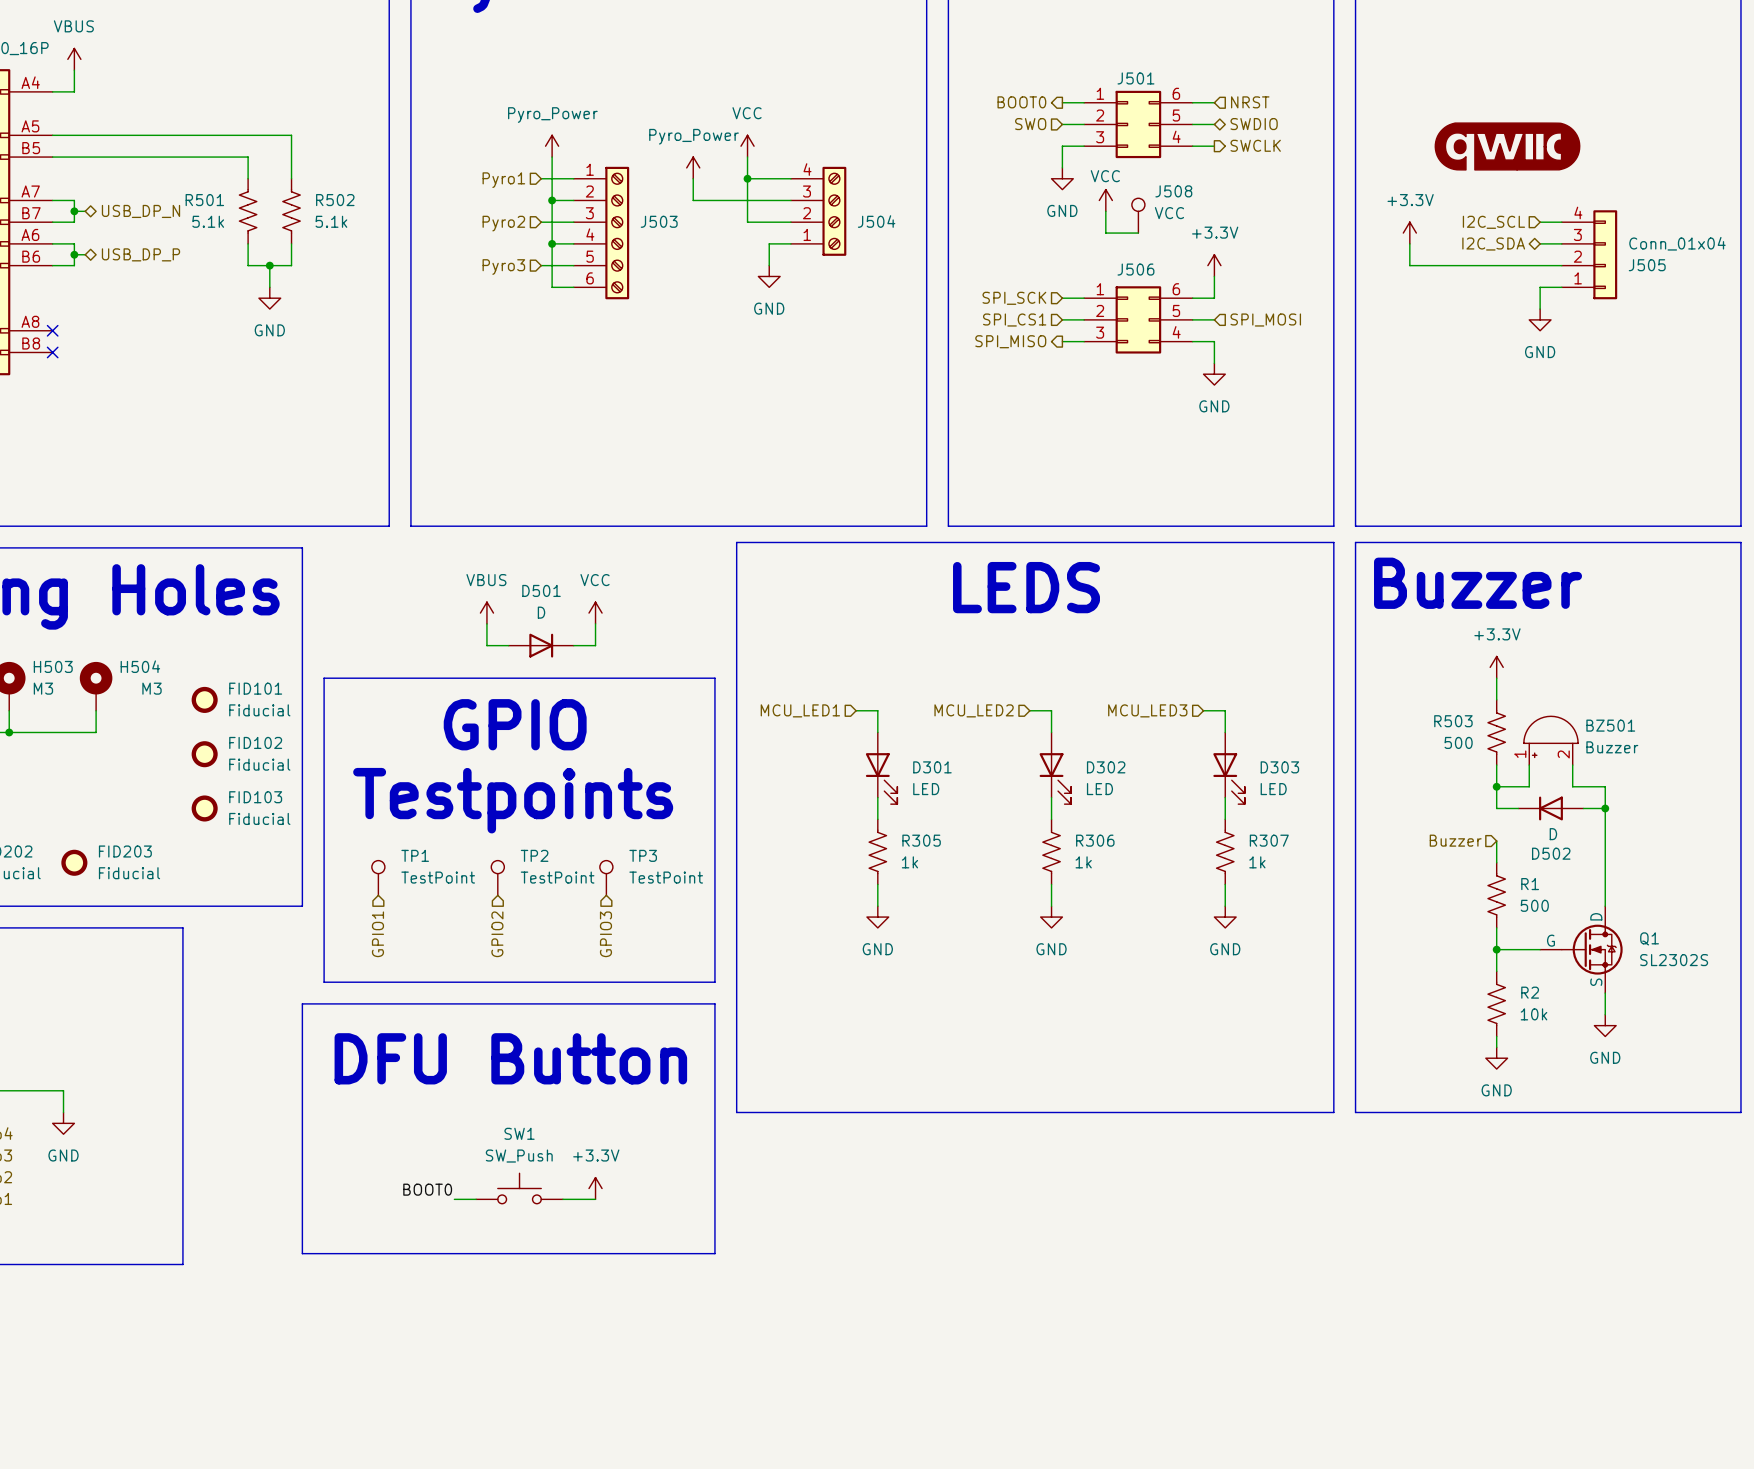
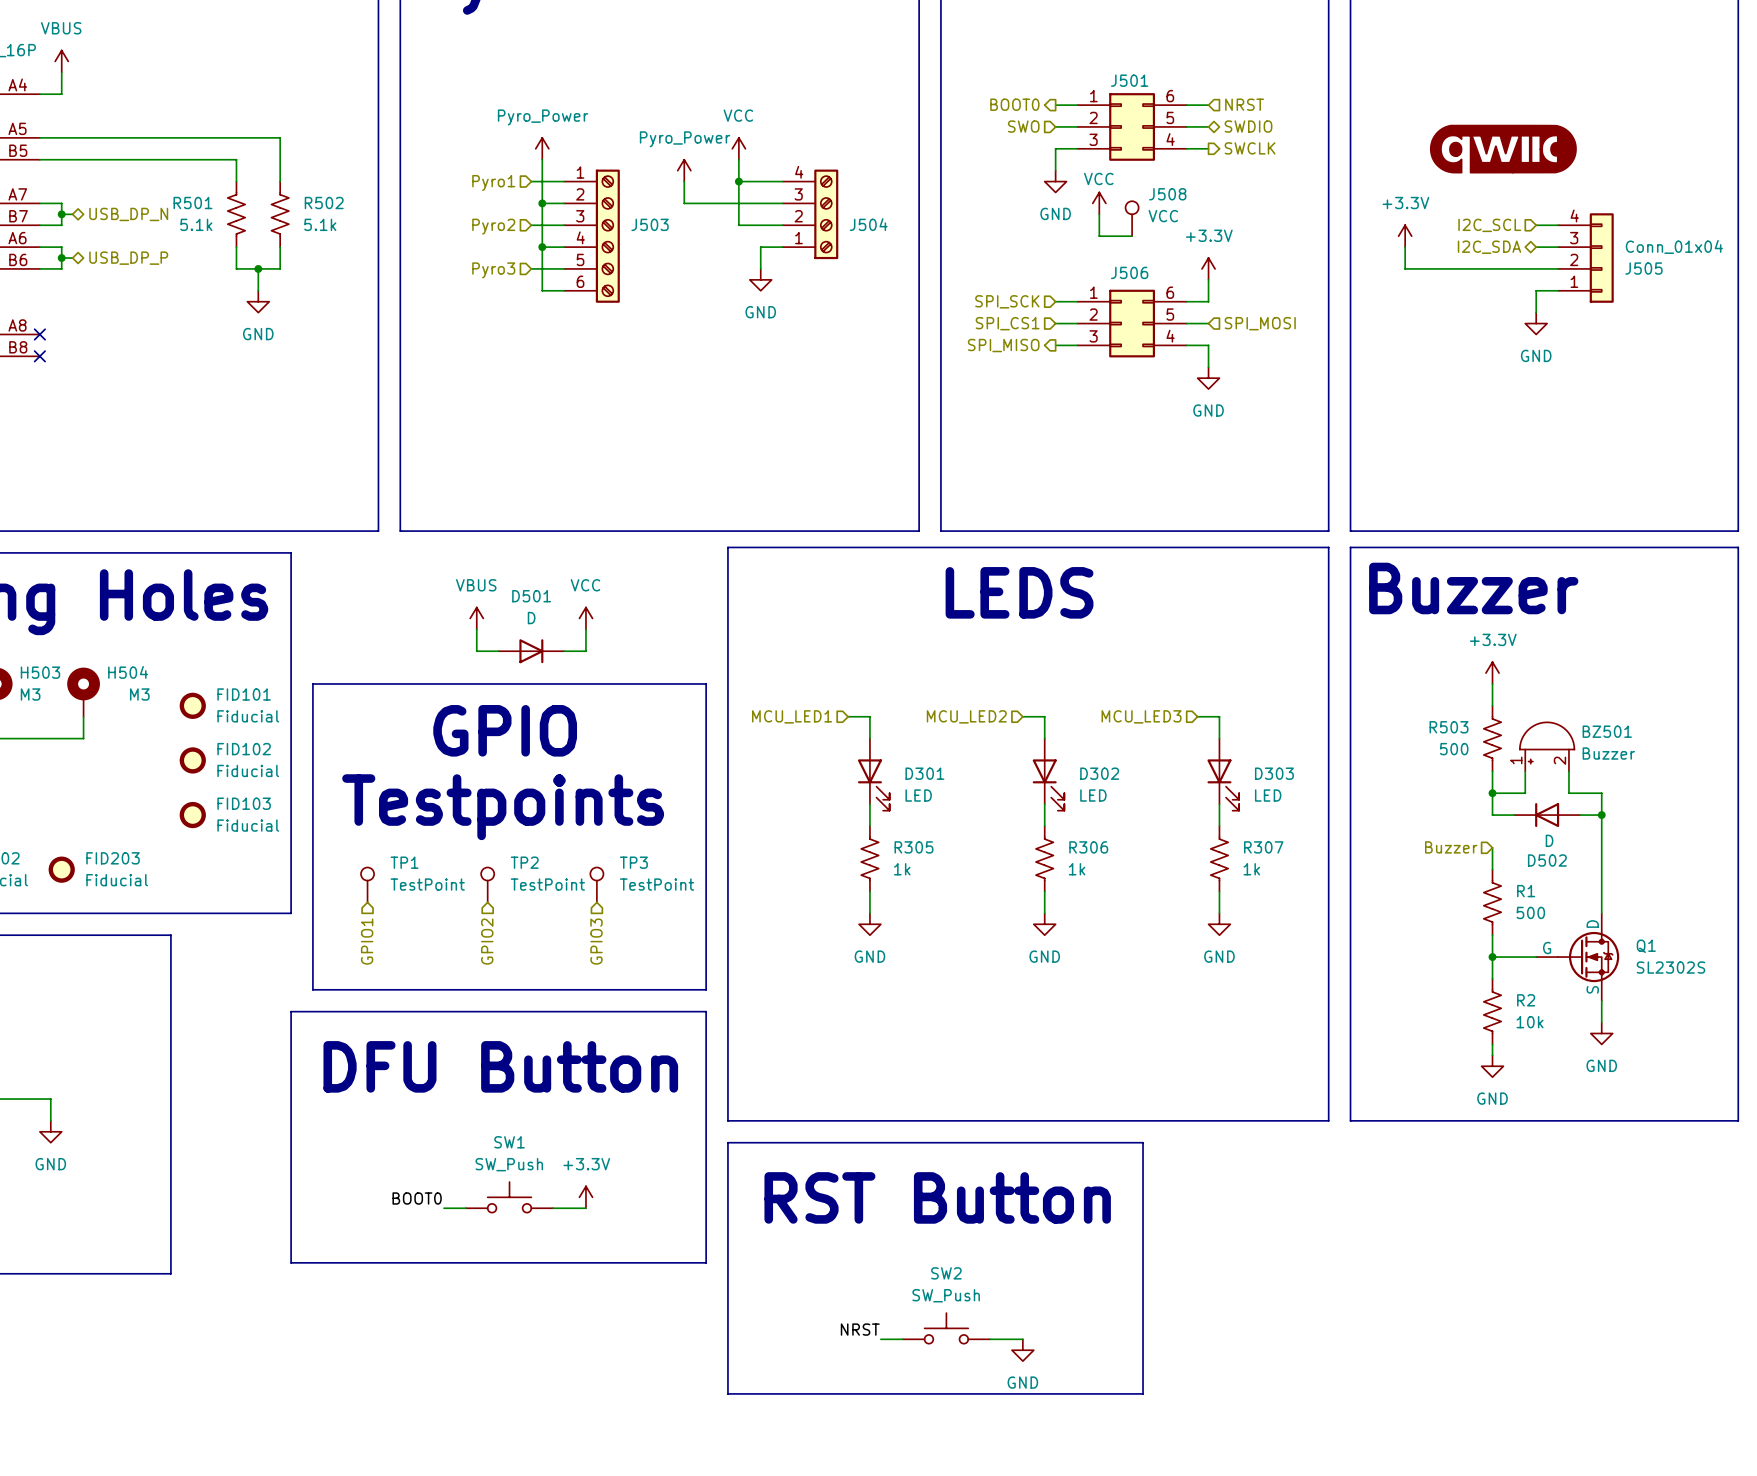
line: none -> (727, 1142) (1143, 1142) (1143, 1393) (727, 1393) (727, 1142)
text: none -> RST Button (937, 1197)
SW2: none -> SW_Push (946, 1328)
label: none -> NRST (860, 1329)
wire: none -> (880, 1339) (902, 1339)
wire: none -> (990, 1339) (1022, 1339)
power symbol: none -> GND (1022, 1350)

